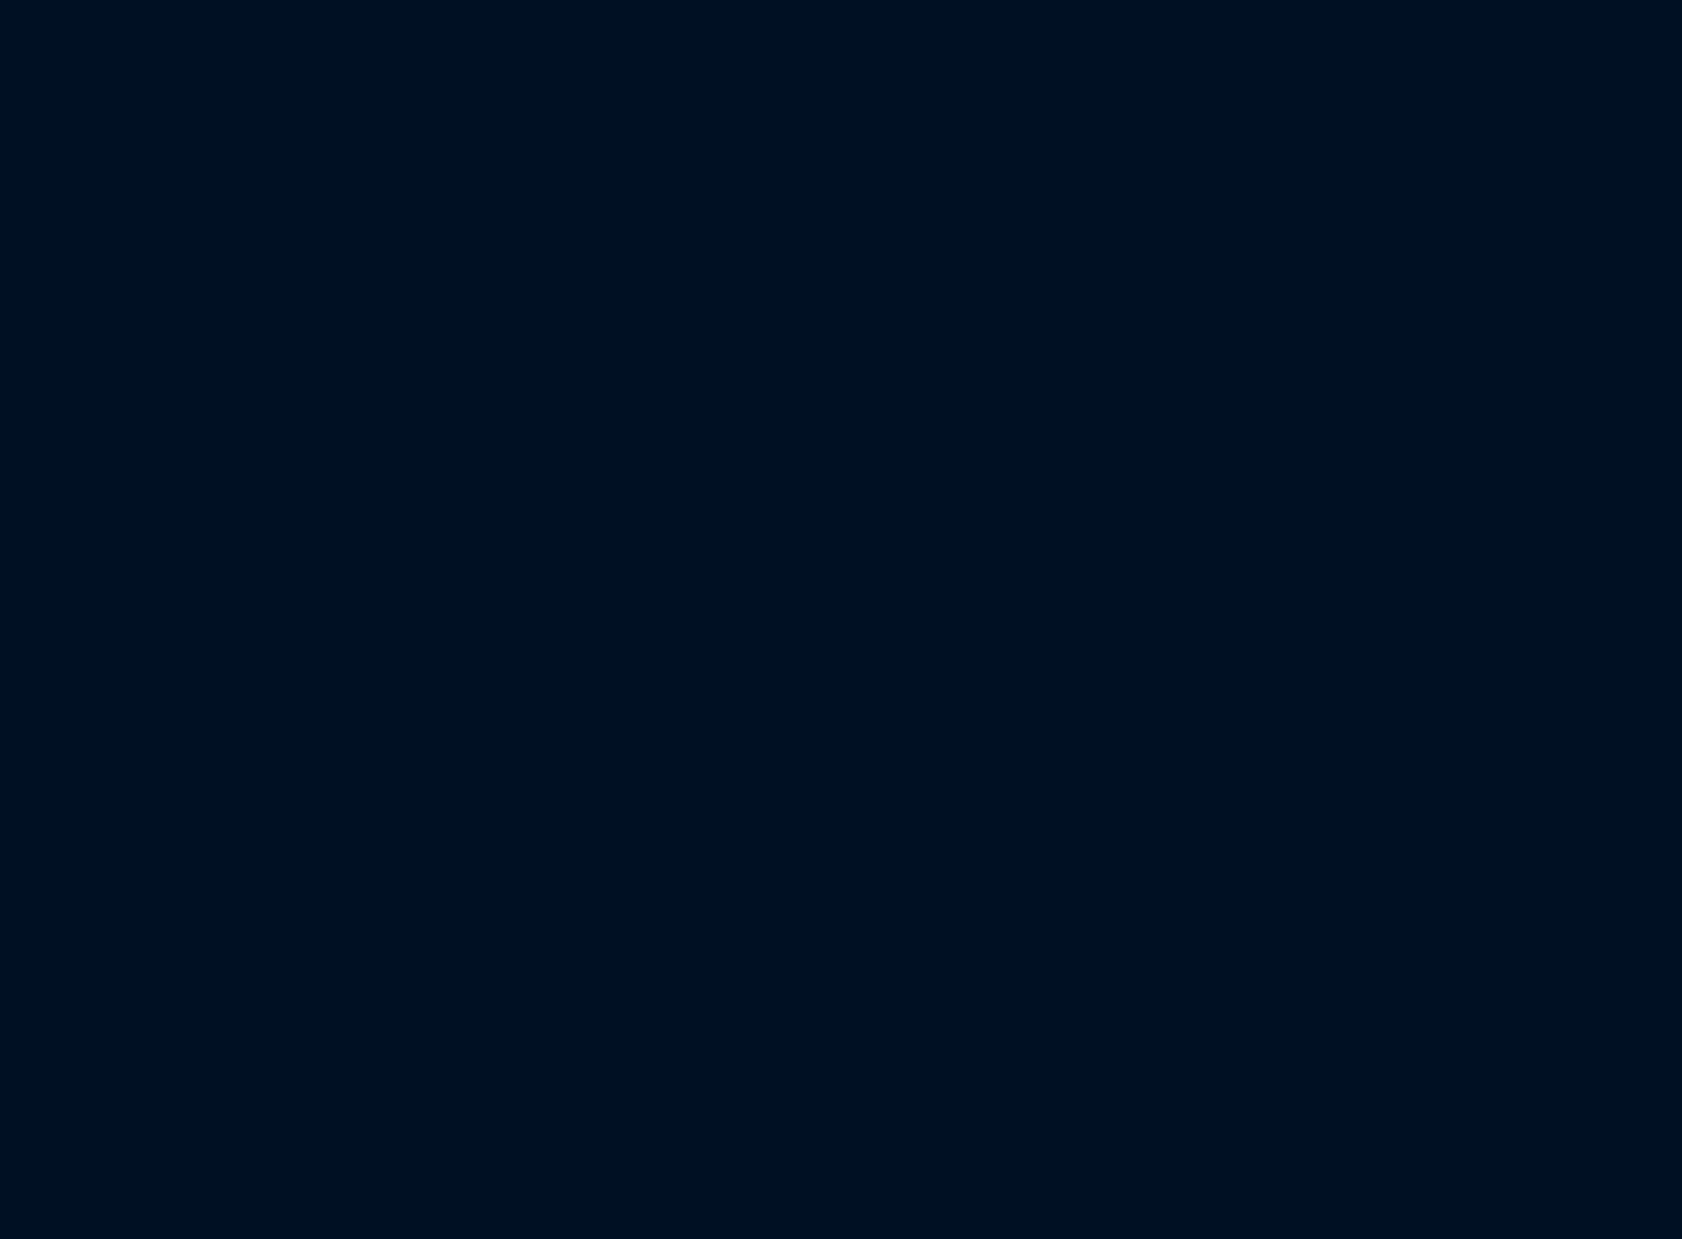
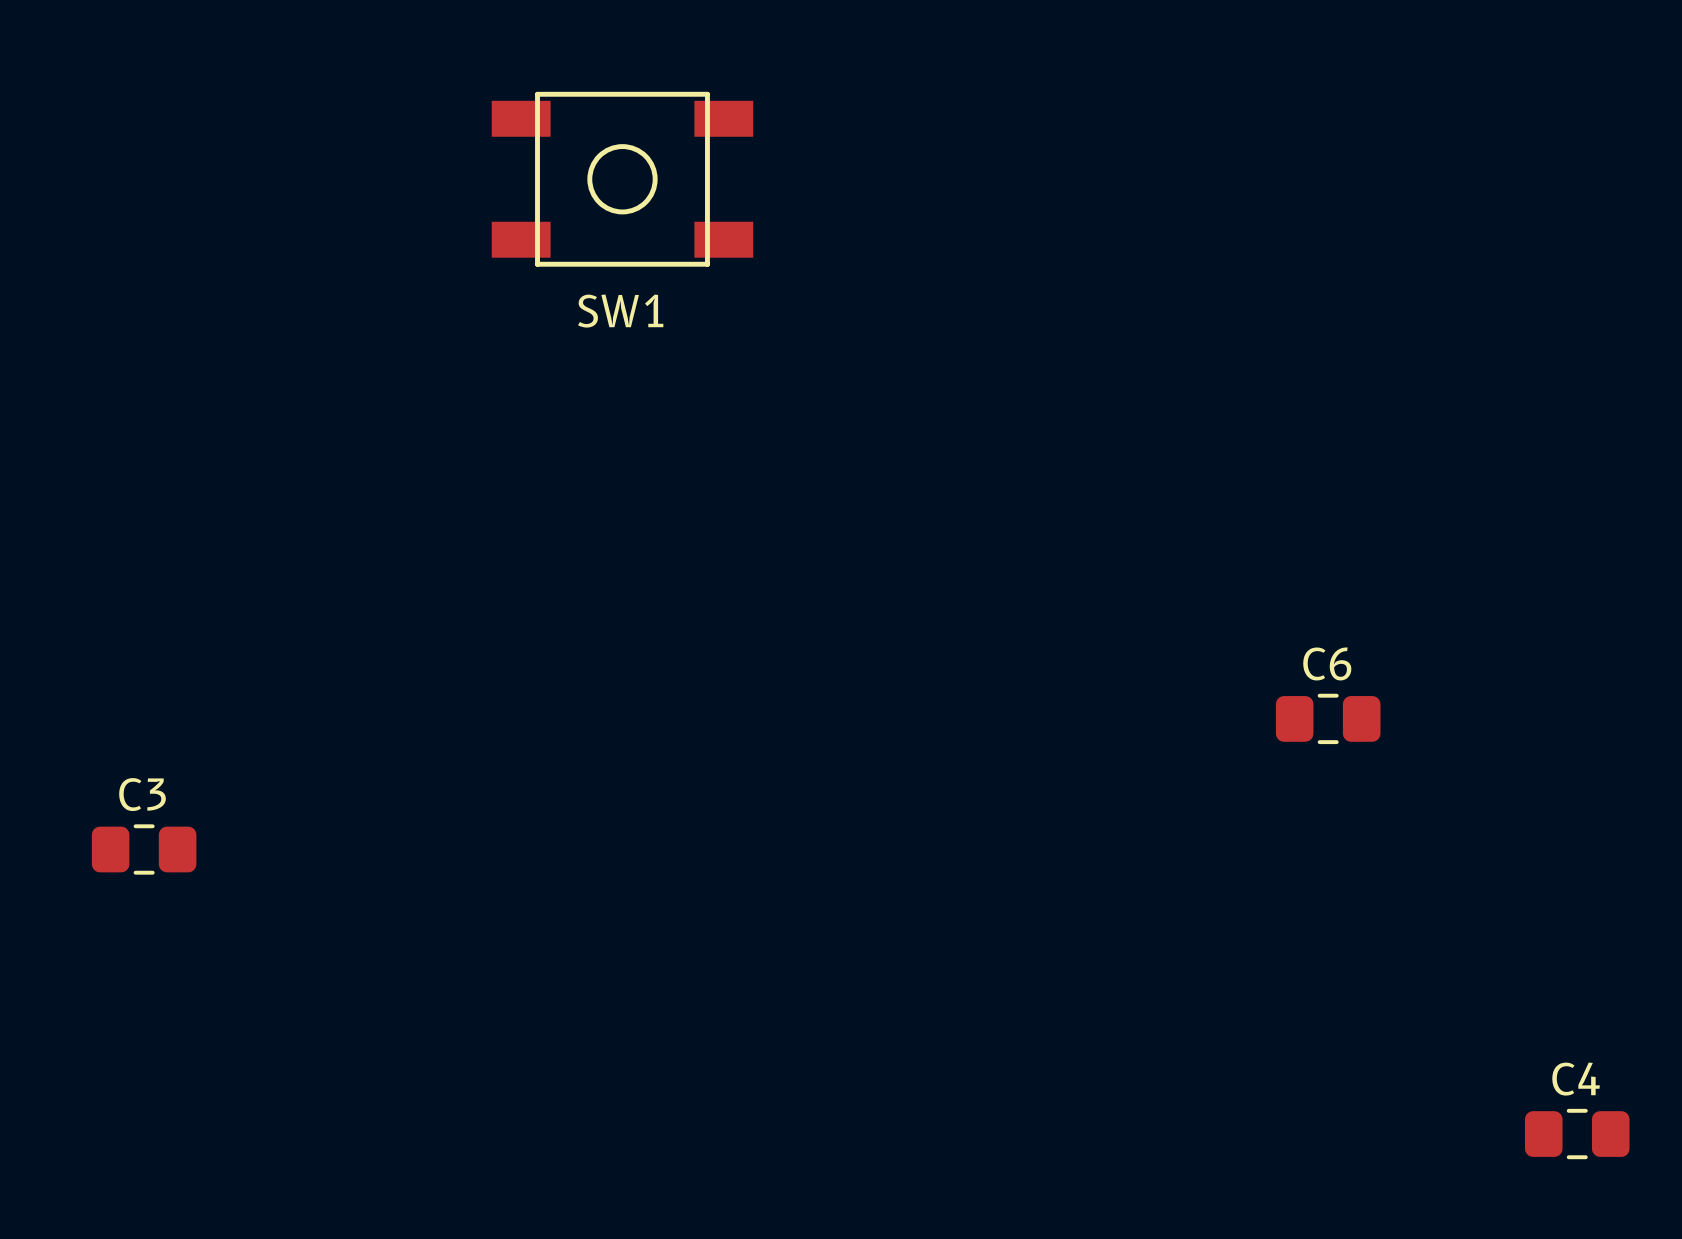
SW1: none -> (622, 179)
C6: none -> (1328, 718)
C3: none -> (144, 849)
C4: none -> (1577, 1134)

